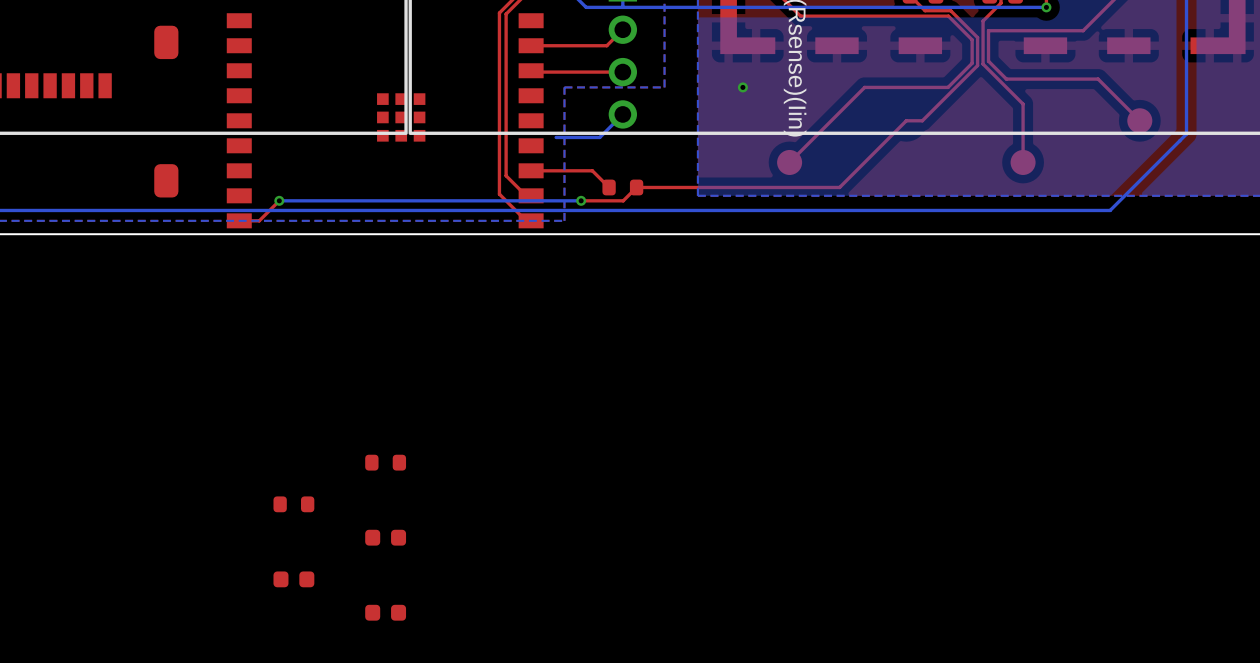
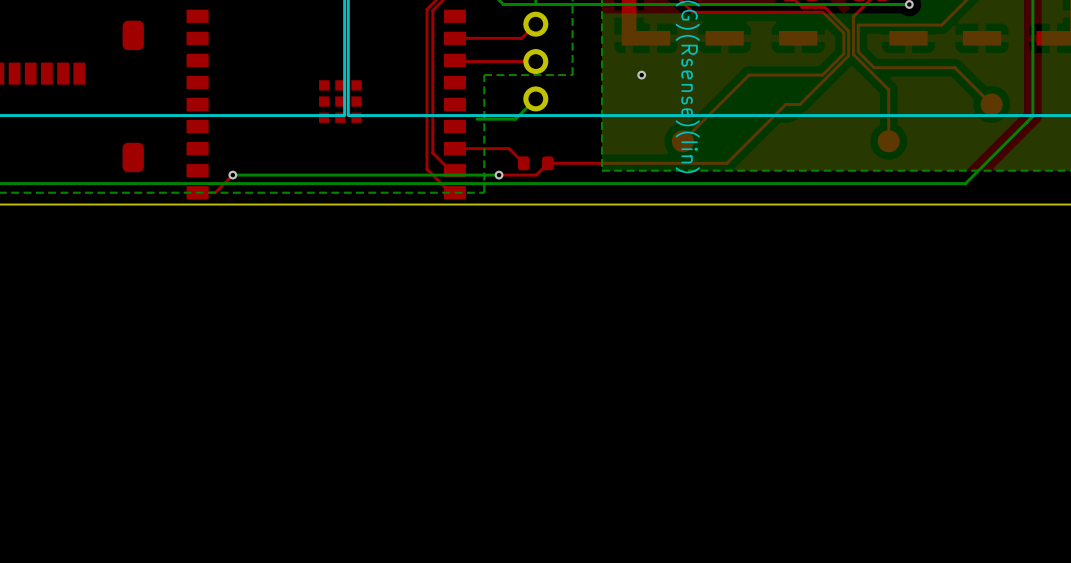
part: (385, 462) -> none
part: (293, 504) -> none
part: (385, 537) -> none
part: (293, 579) -> none
part: (385, 612) -> none

